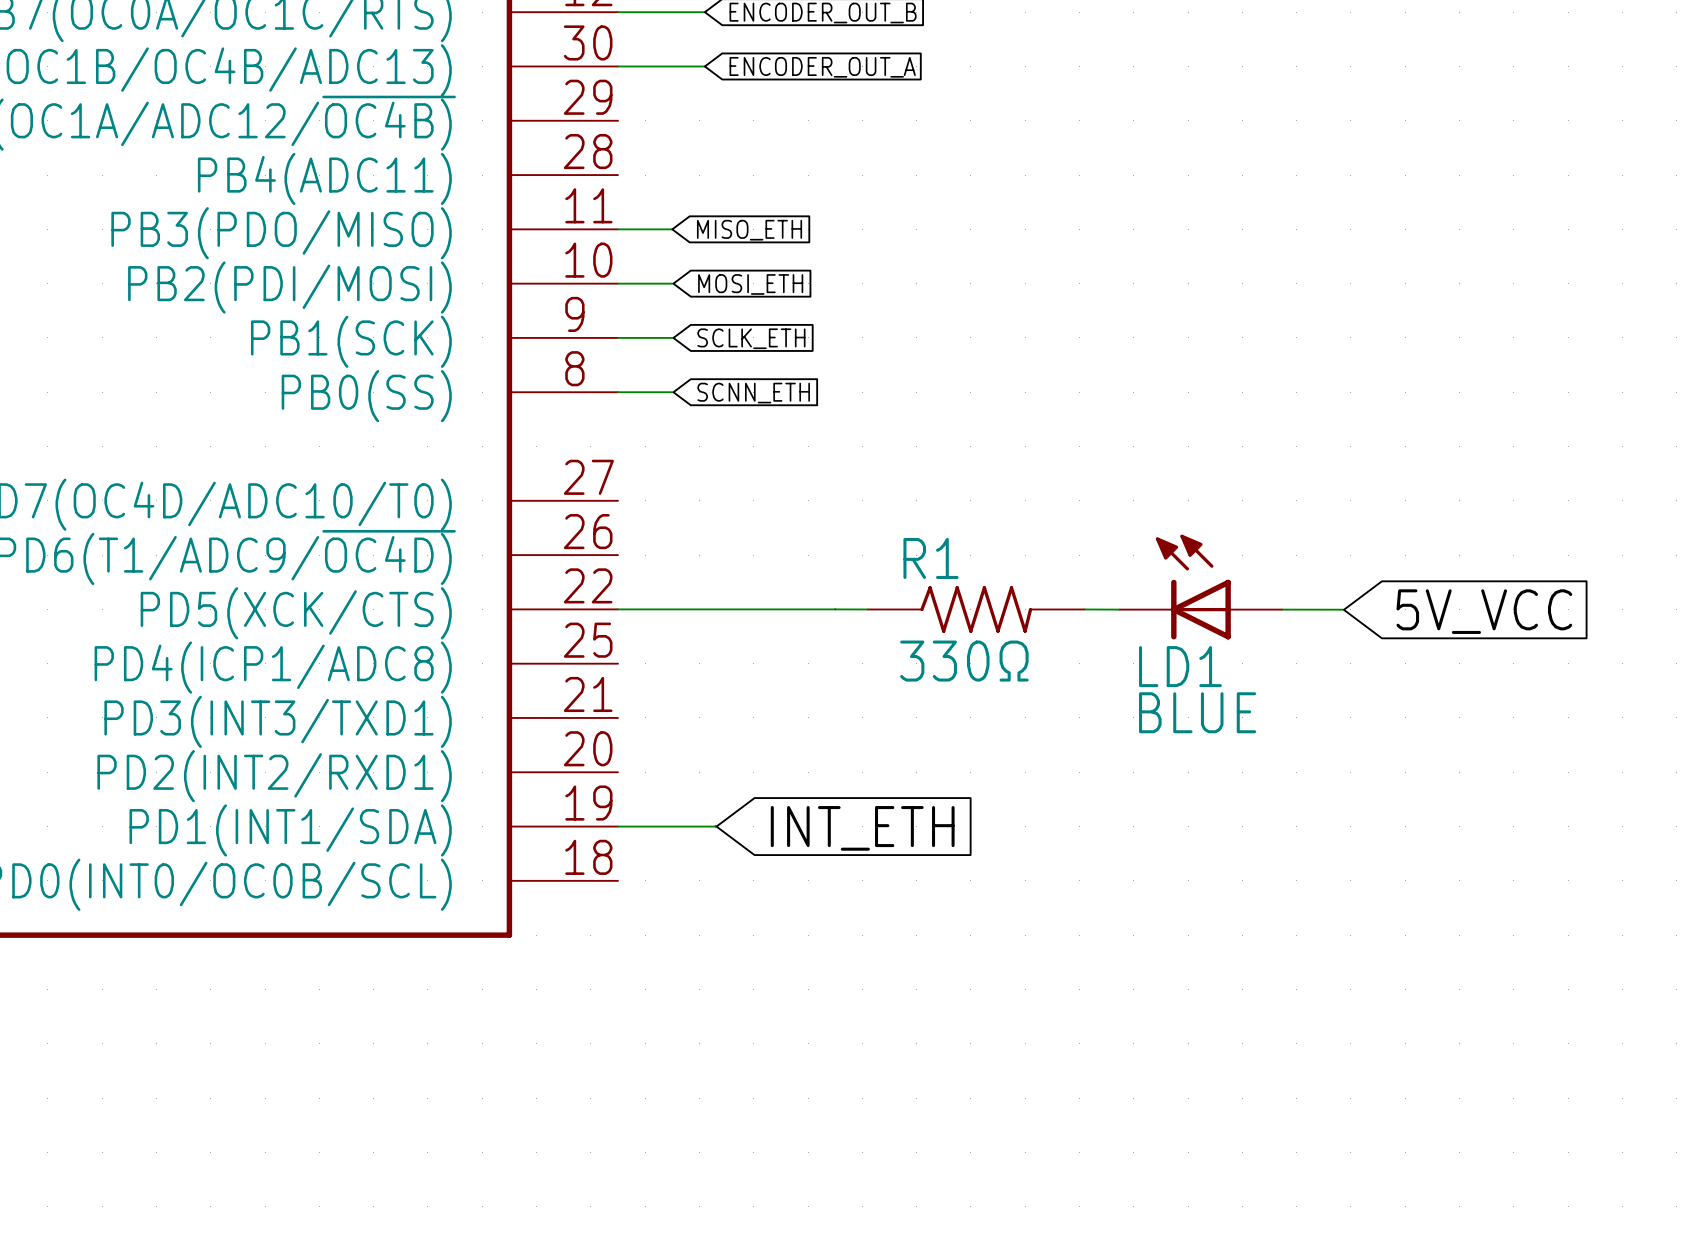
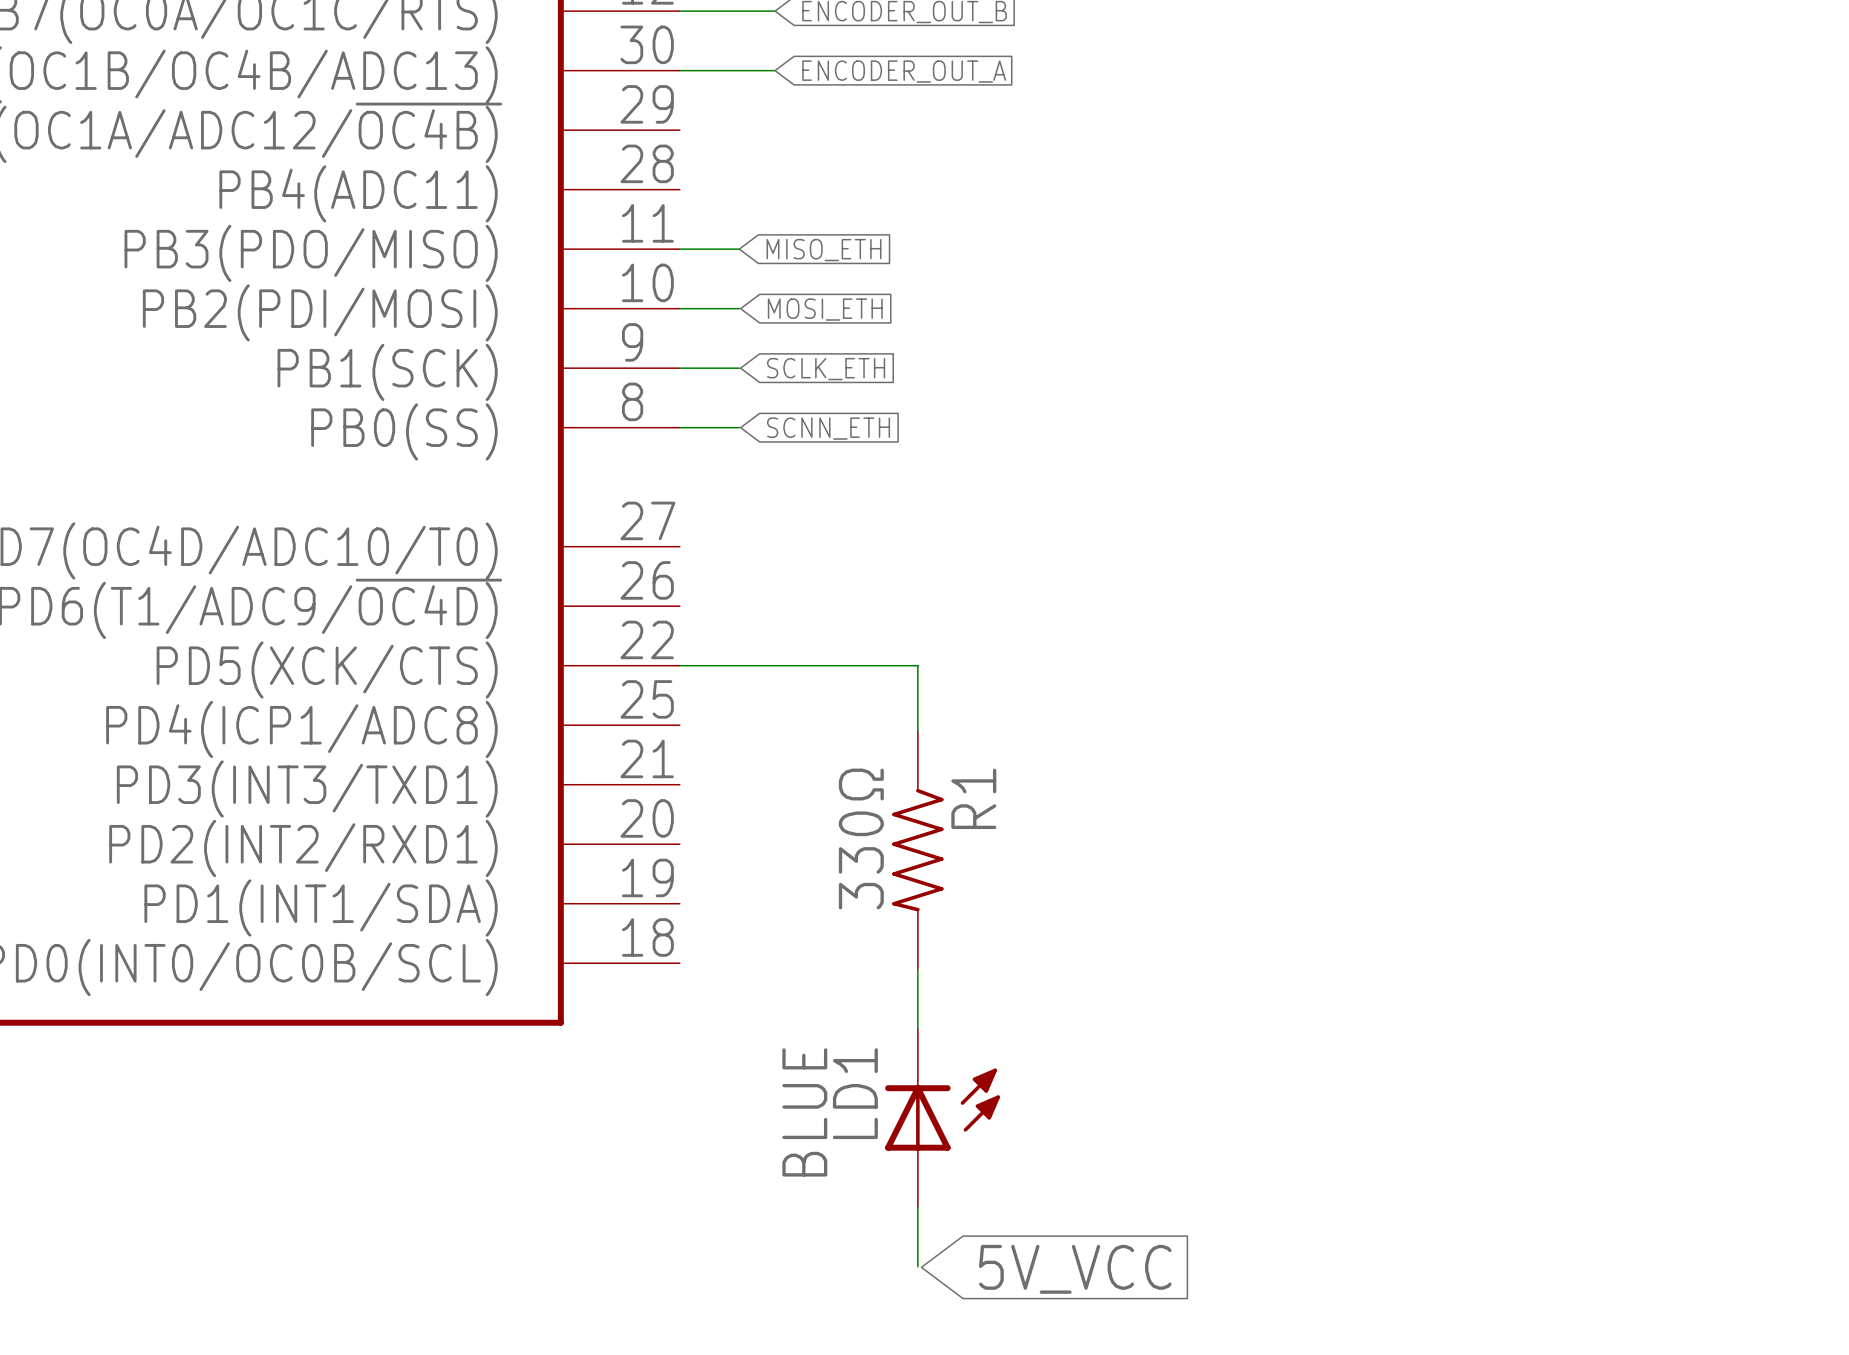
LD1 rotation: 0° (1193, 587) -> 90° clockwise (942, 1109)
LD1 position: (1200, 587) -> (942, 1117)
wire: (835, 609) (867, 609) -> (917, 665) (917, 731)
R1 rotation: 0° (976, 609) -> 90° clockwise (917, 850)
R1 position: (976, 609) -> (917, 850)
wire: (1084, 609) (1119, 609) -> none
wire: (1282, 609) (1343, 609) -> none
global label: 5V_VCC (1484, 611) -> none
wire: (618, 826) (715, 826) -> none
global label: INT_ETH (862, 828) -> none
wire: none -> (917, 969) (917, 1028)
wire: none -> (917, 1207) (917, 1266)
global label: none -> 5V_VCC (1075, 1269)

